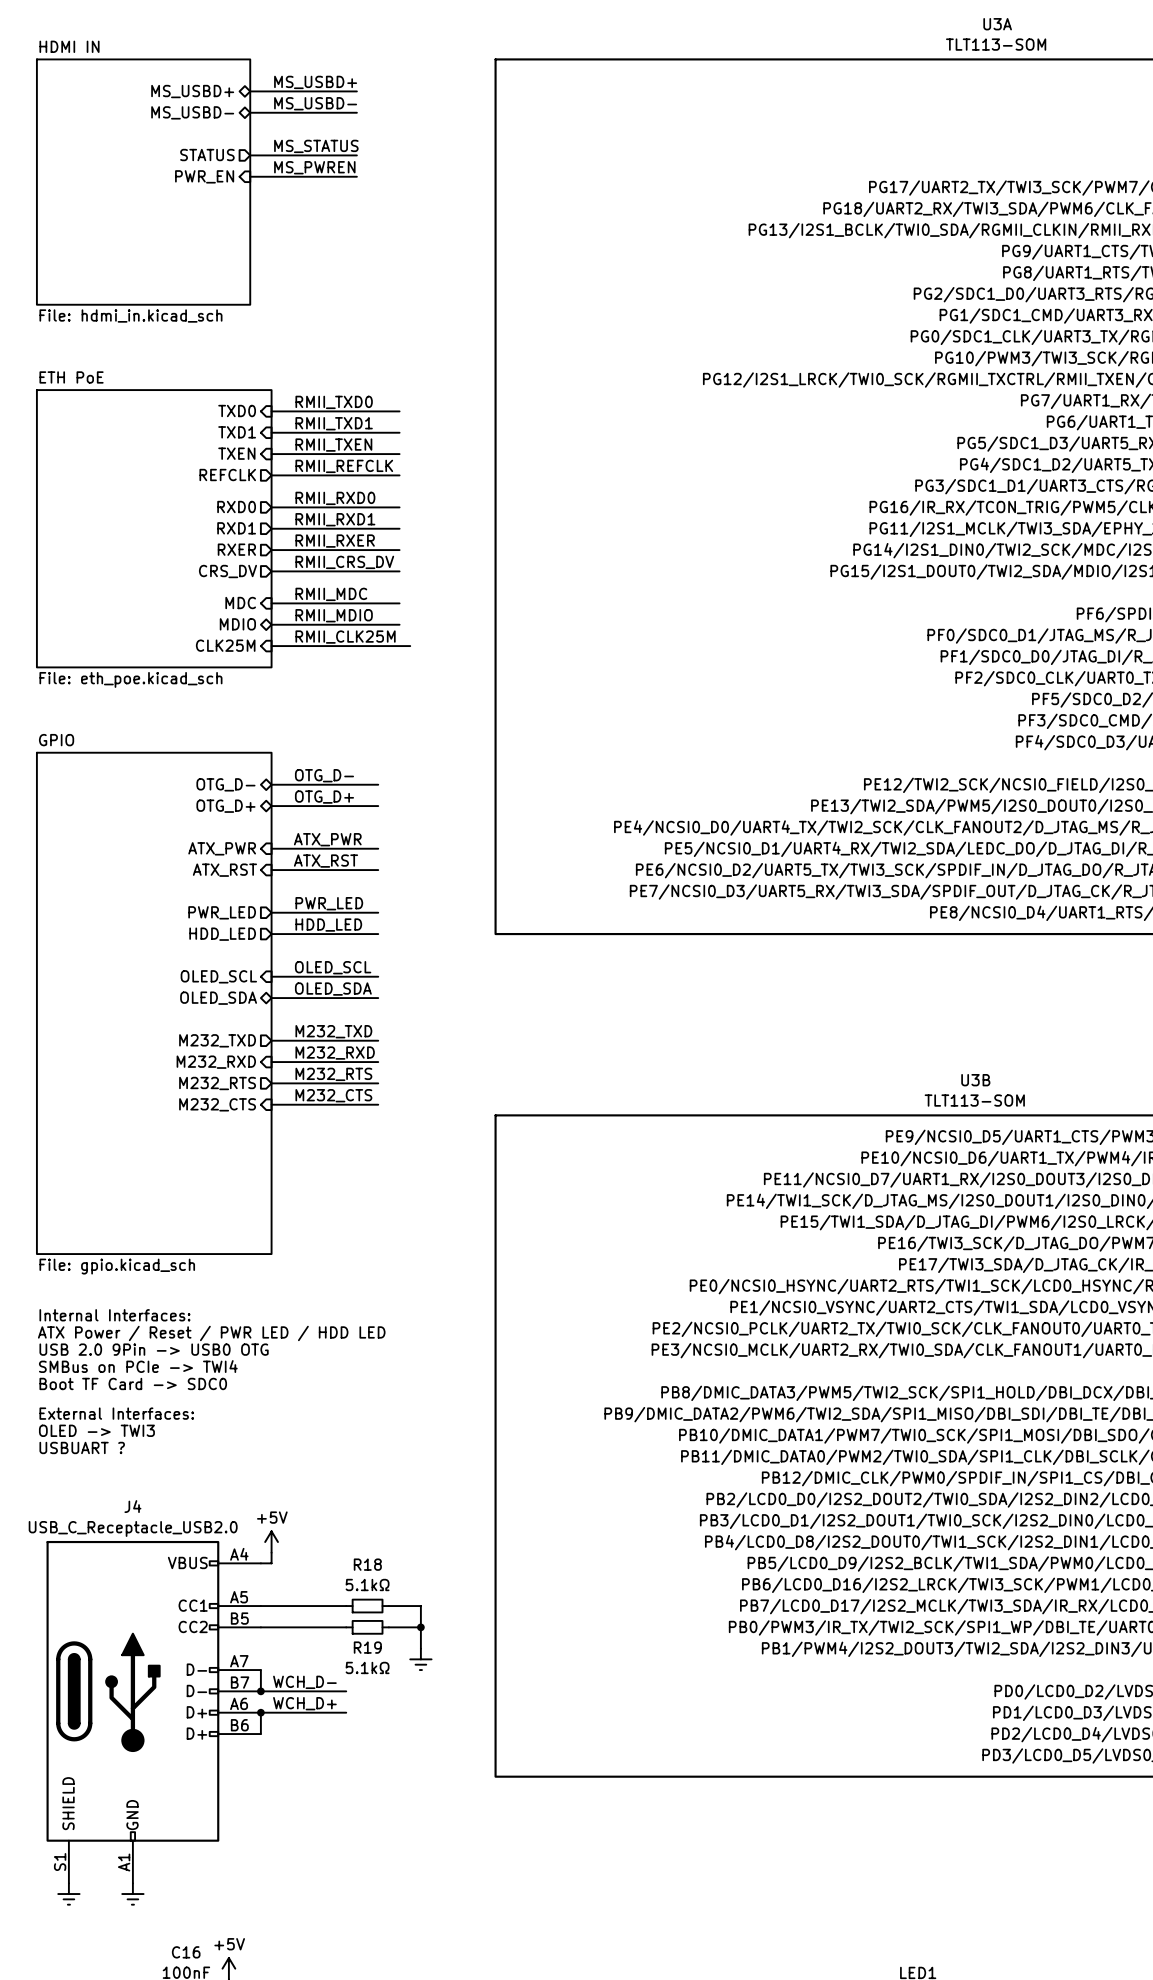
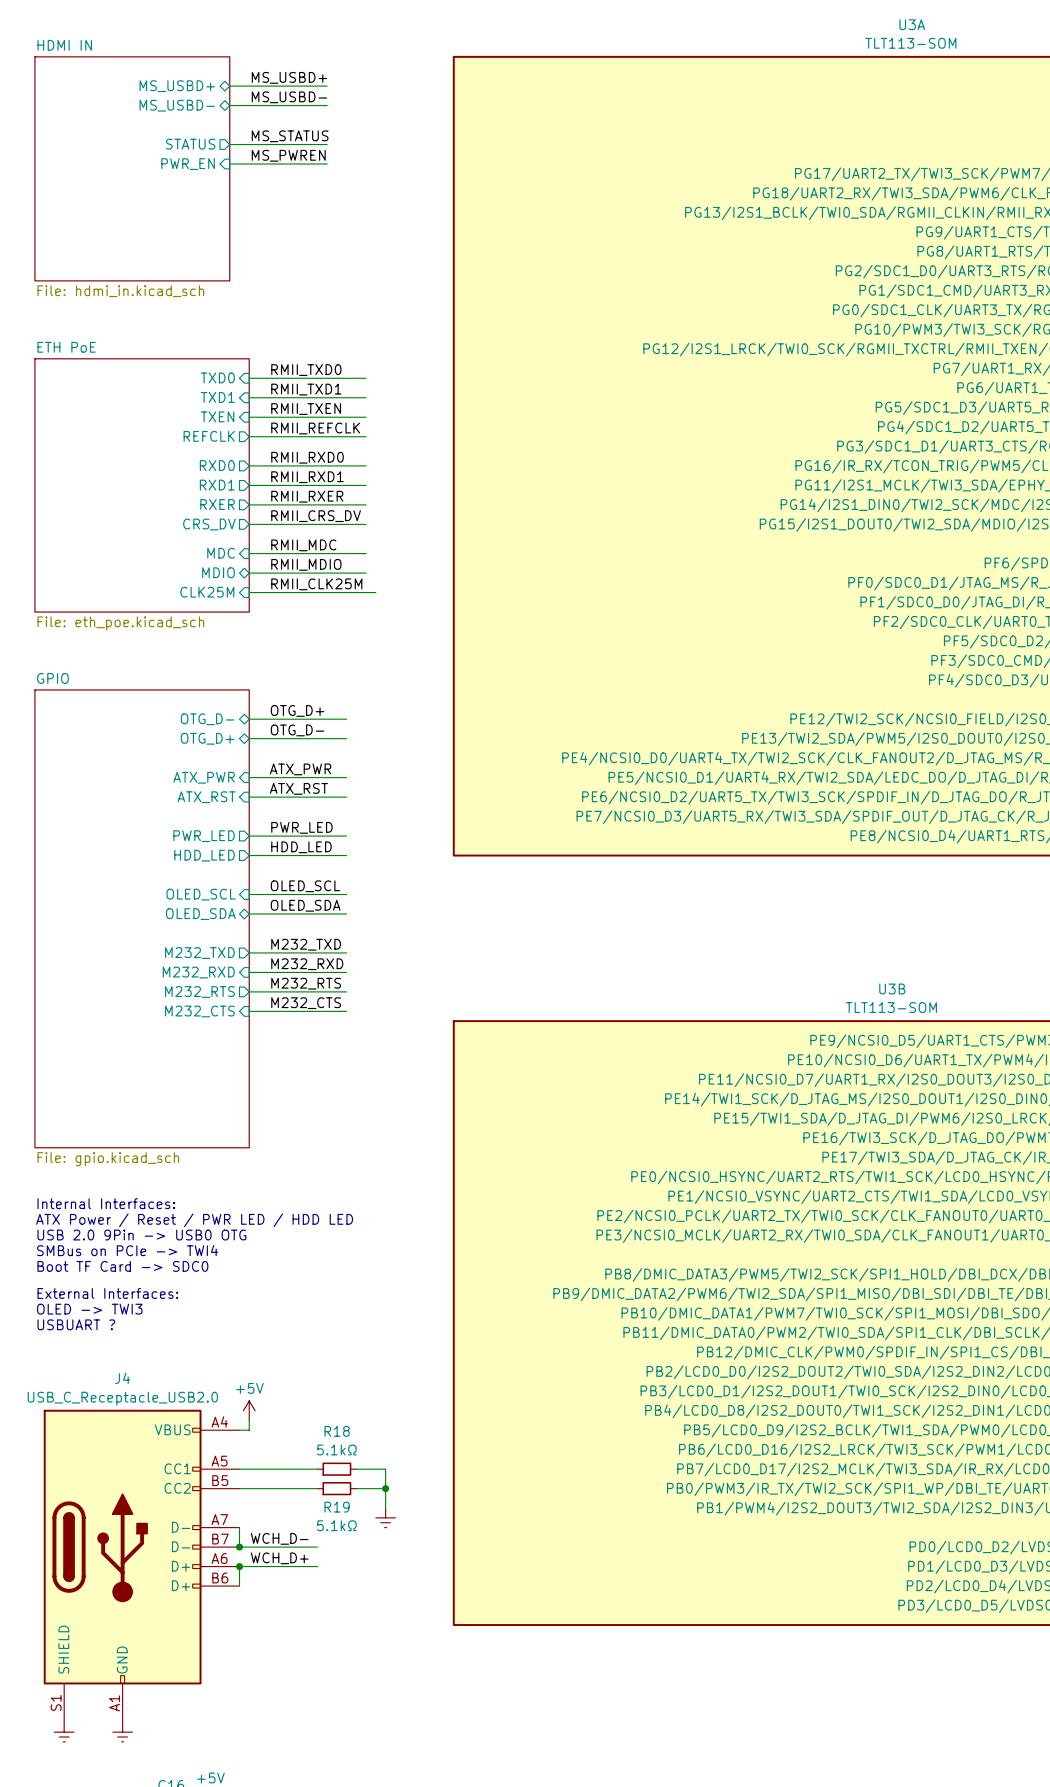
label: OTG_D- (324, 775) -> OTG_D+ (297, 710)
label: OTG_D+ (324, 797) -> OTG_D- (297, 730)

